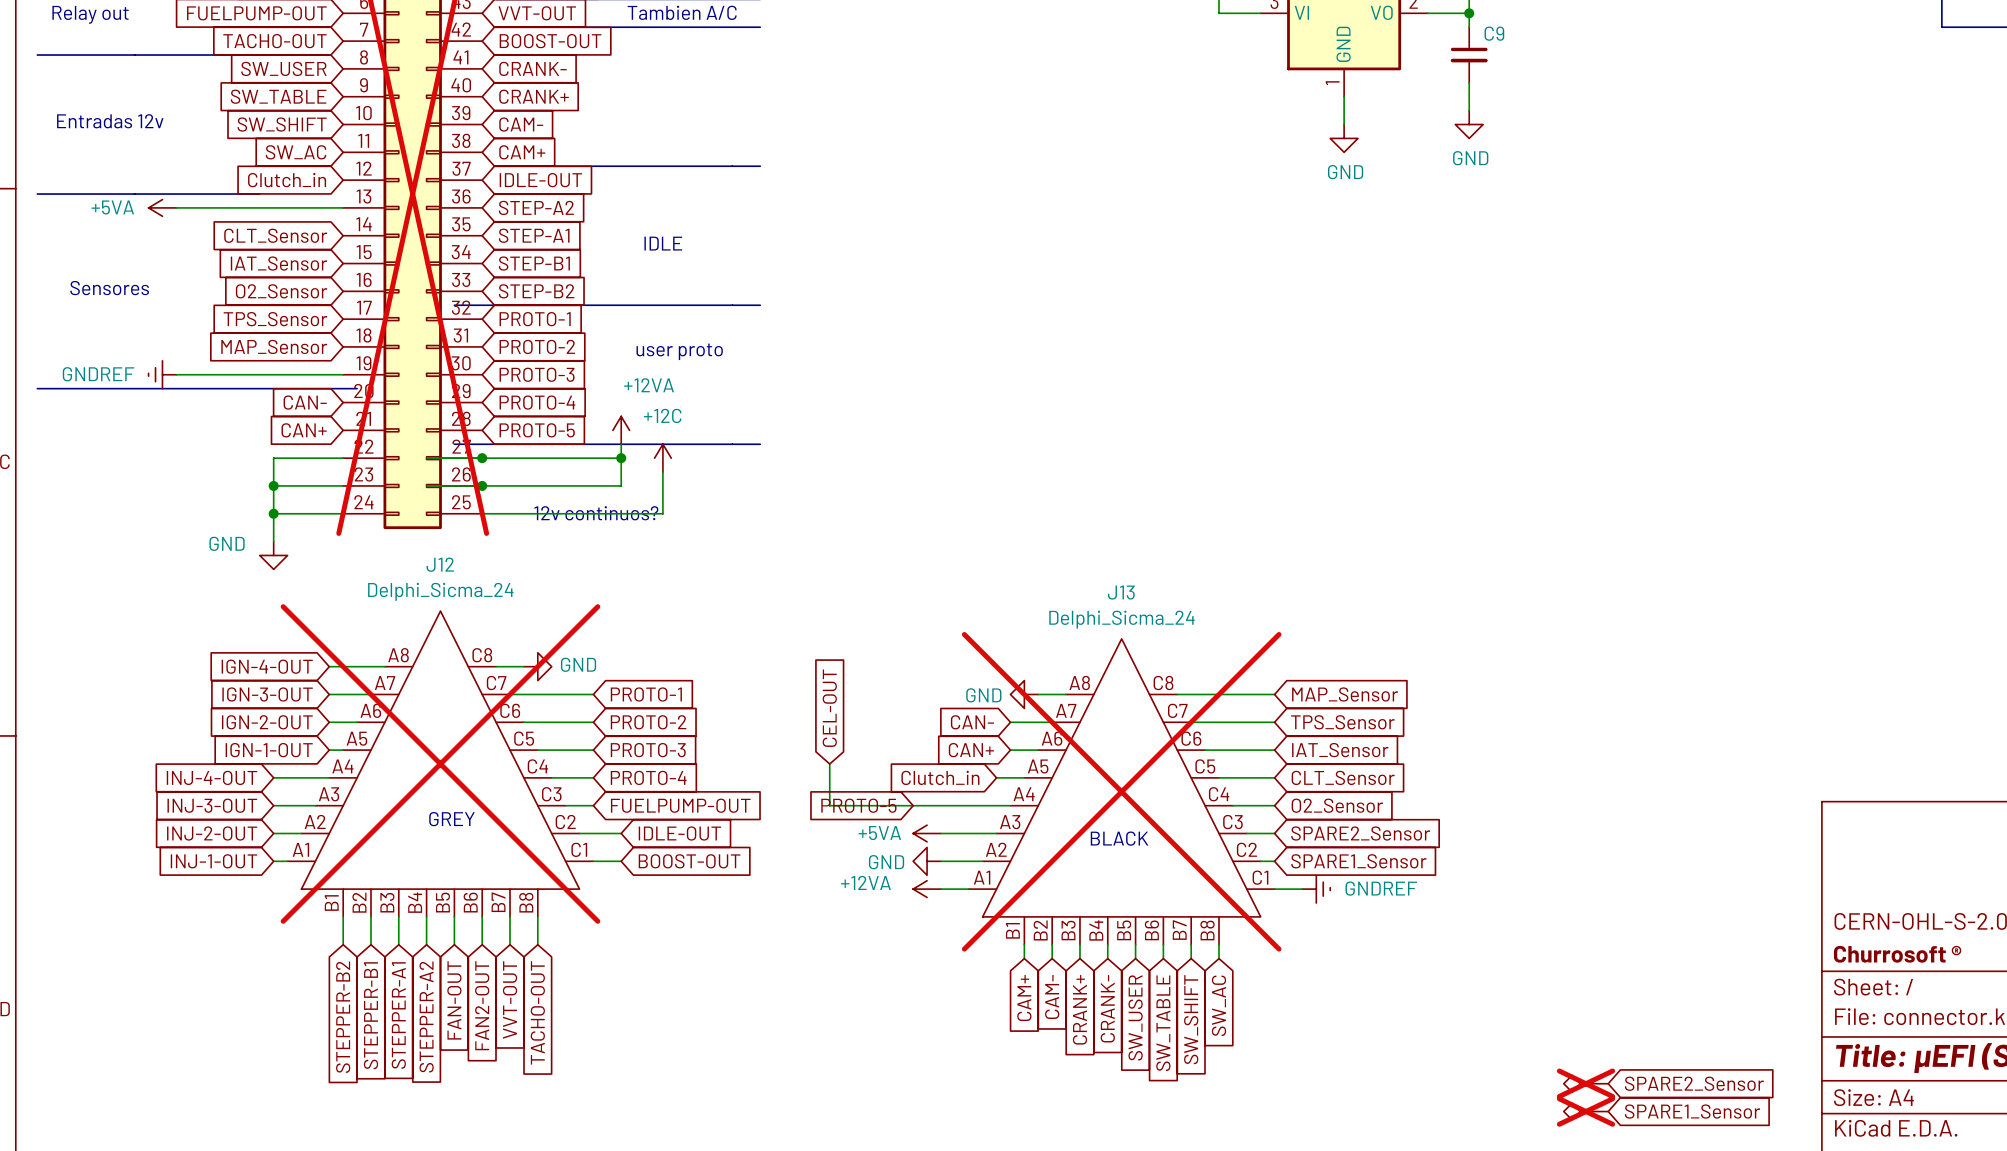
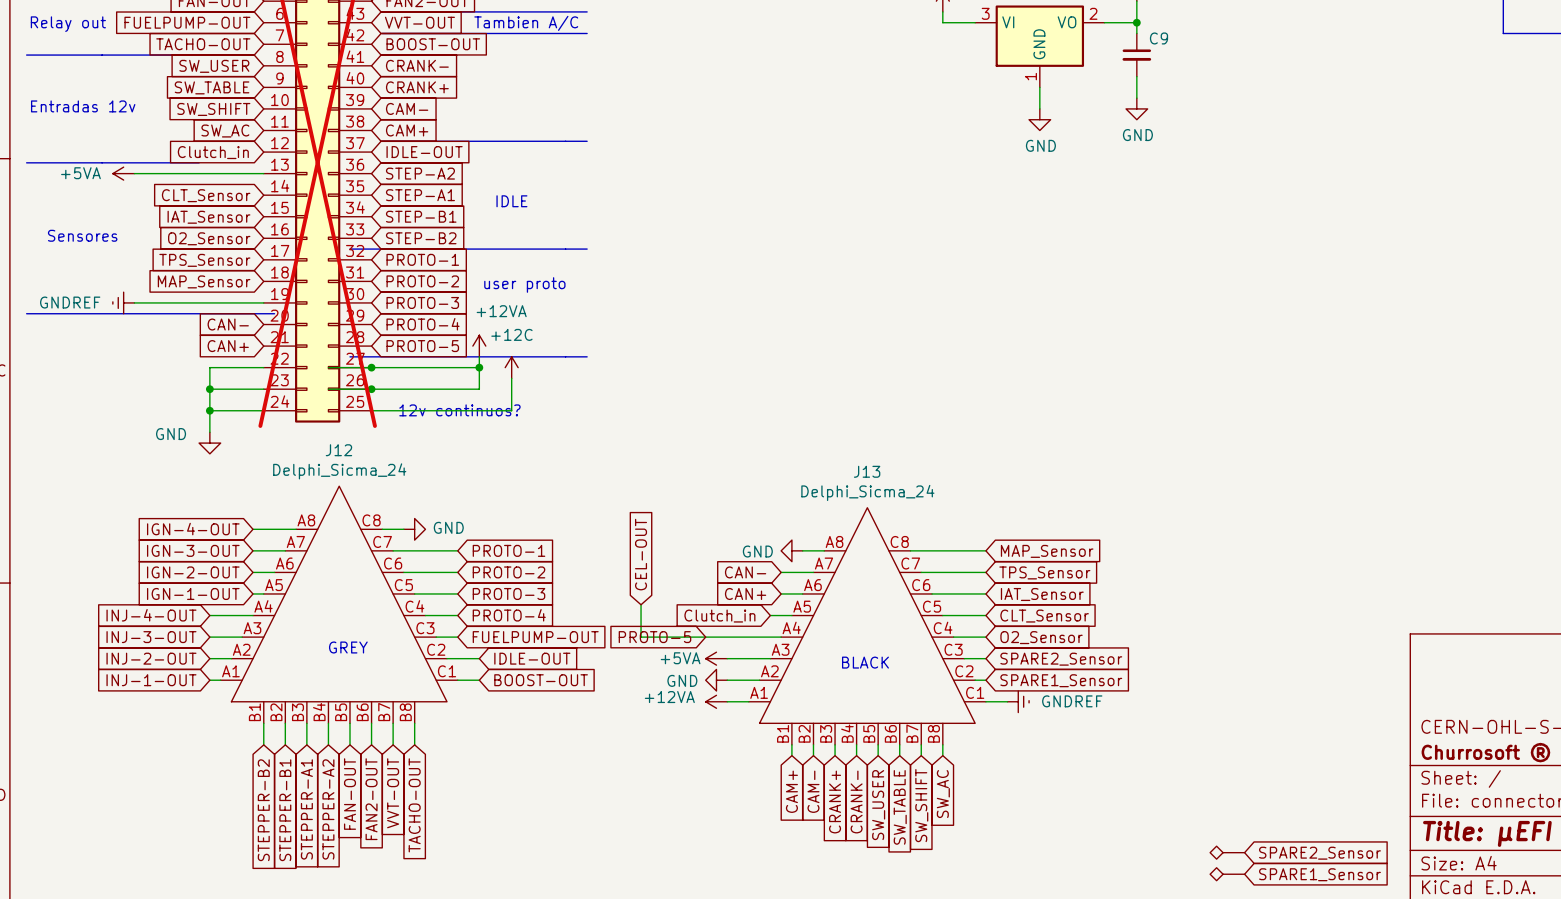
J12 do-not-place cross: (440, 763) -> none
J13 do-not-place cross: (1121, 791) -> none
part do-not-place cross: (1585, 1083) -> none
part do-not-place cross: (1585, 1111) -> none

